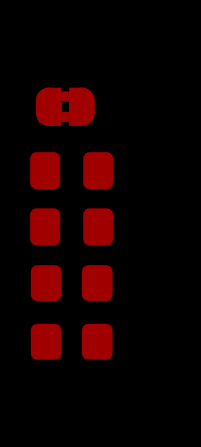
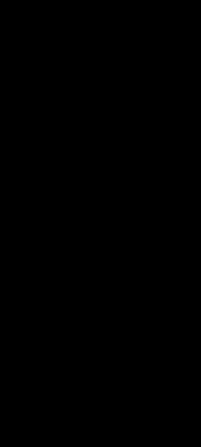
part: (65, 106) -> none
part: (71, 170) -> none
part: (71, 226) -> none
part: (71, 283) -> none
part: (71, 341) -> none

